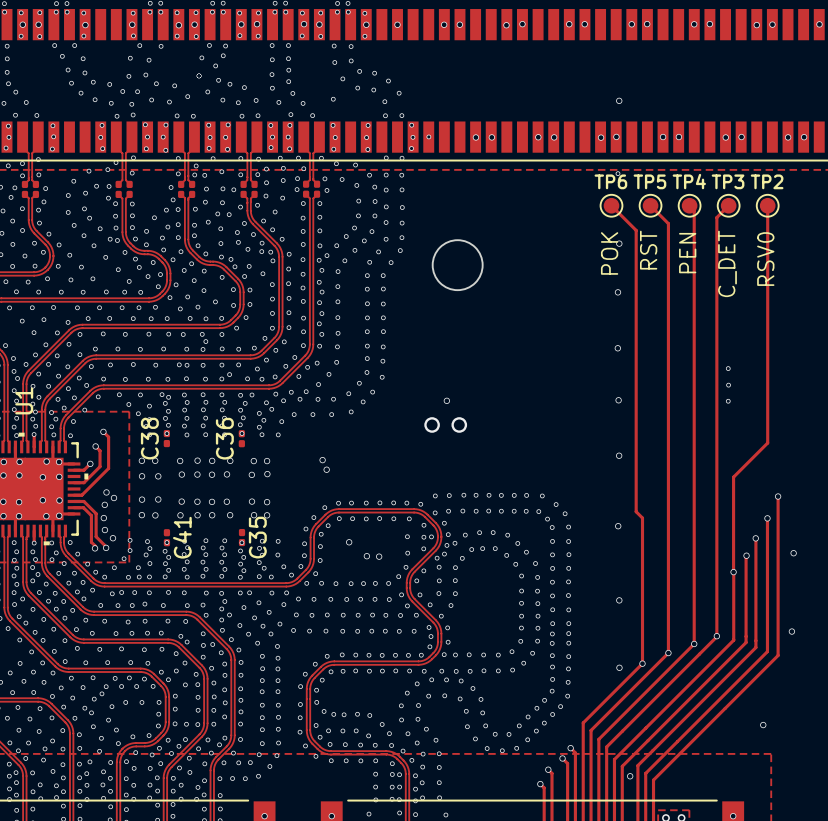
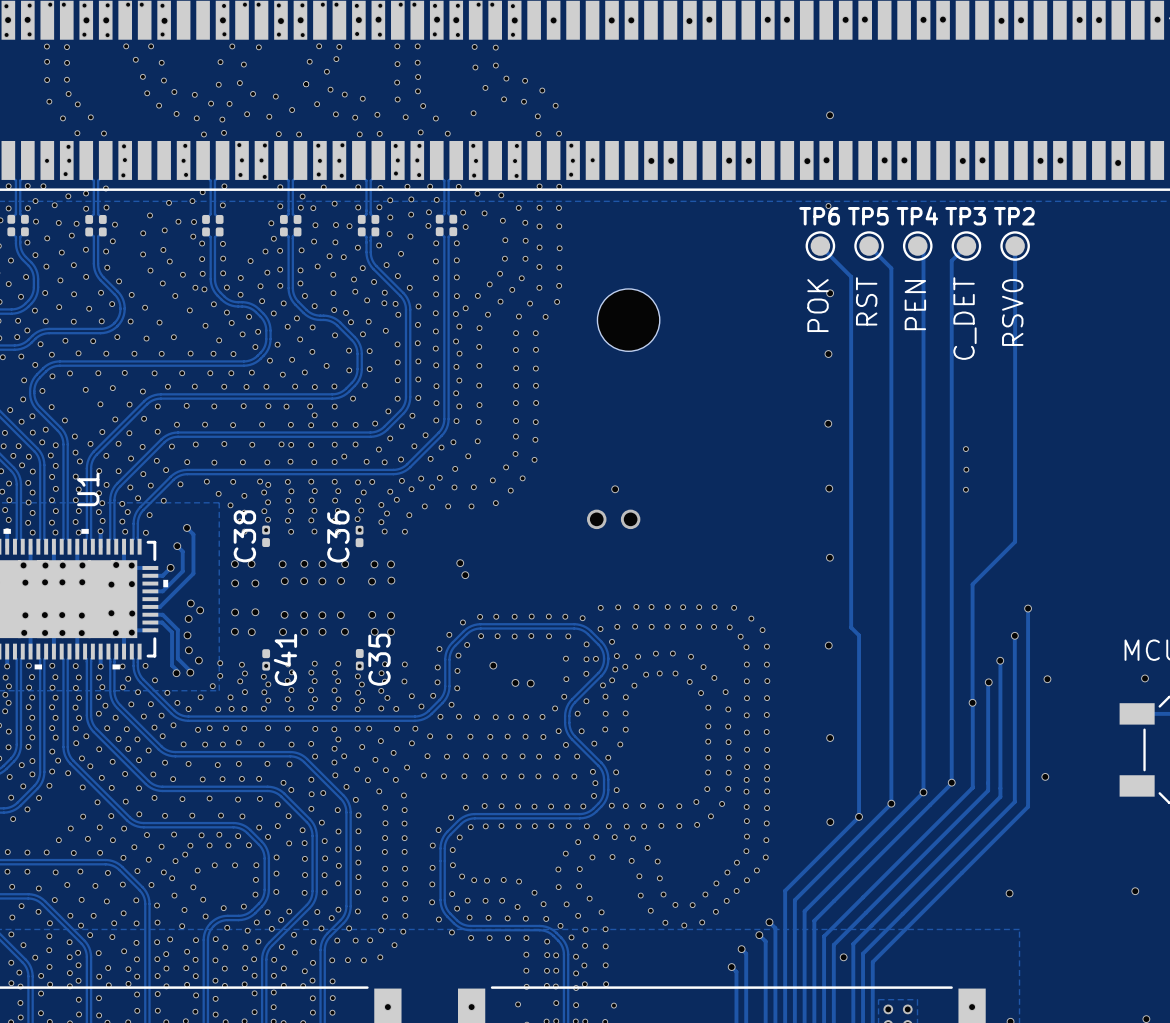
via: (221, 652) -> none
via: none -> (337, 810)
via: (224, 664) -> none
via: (186, 724) -> none

